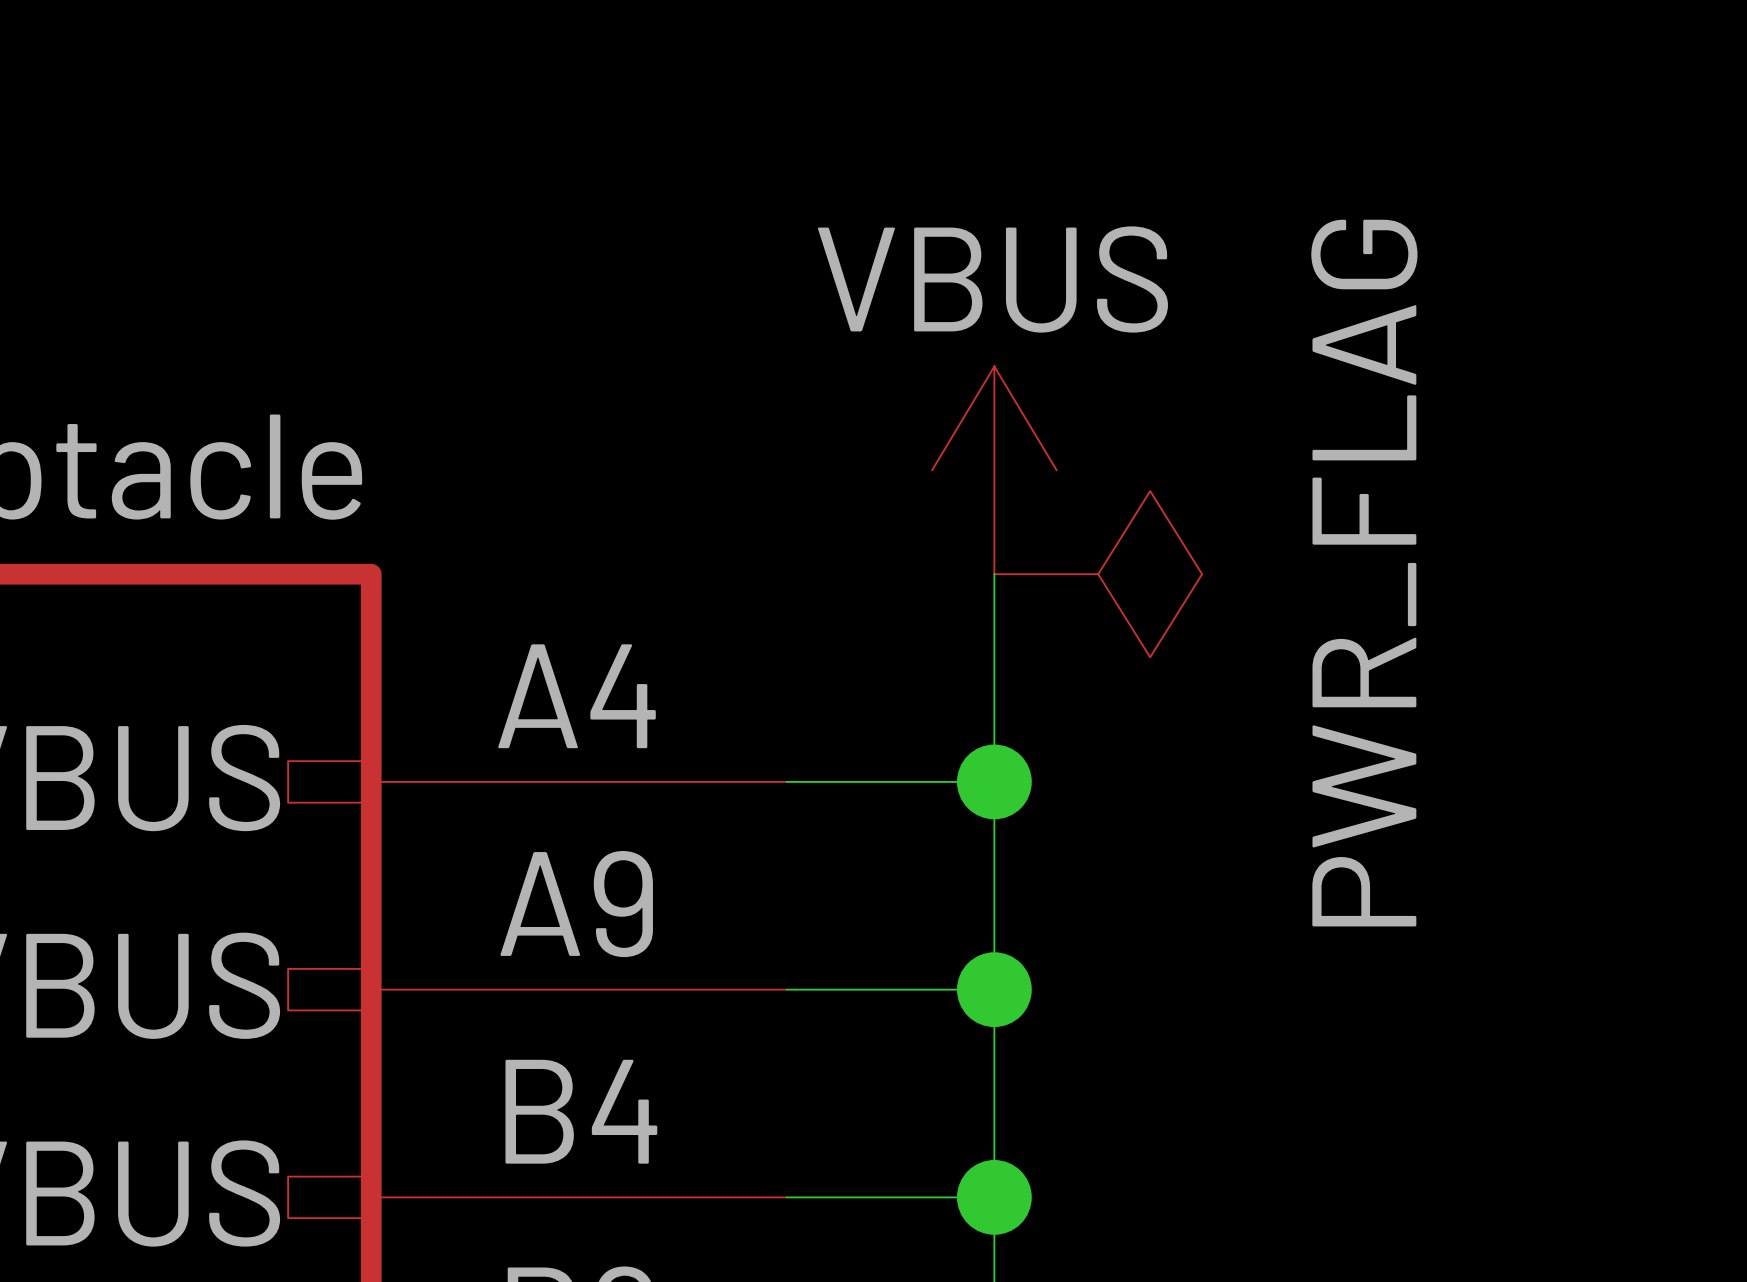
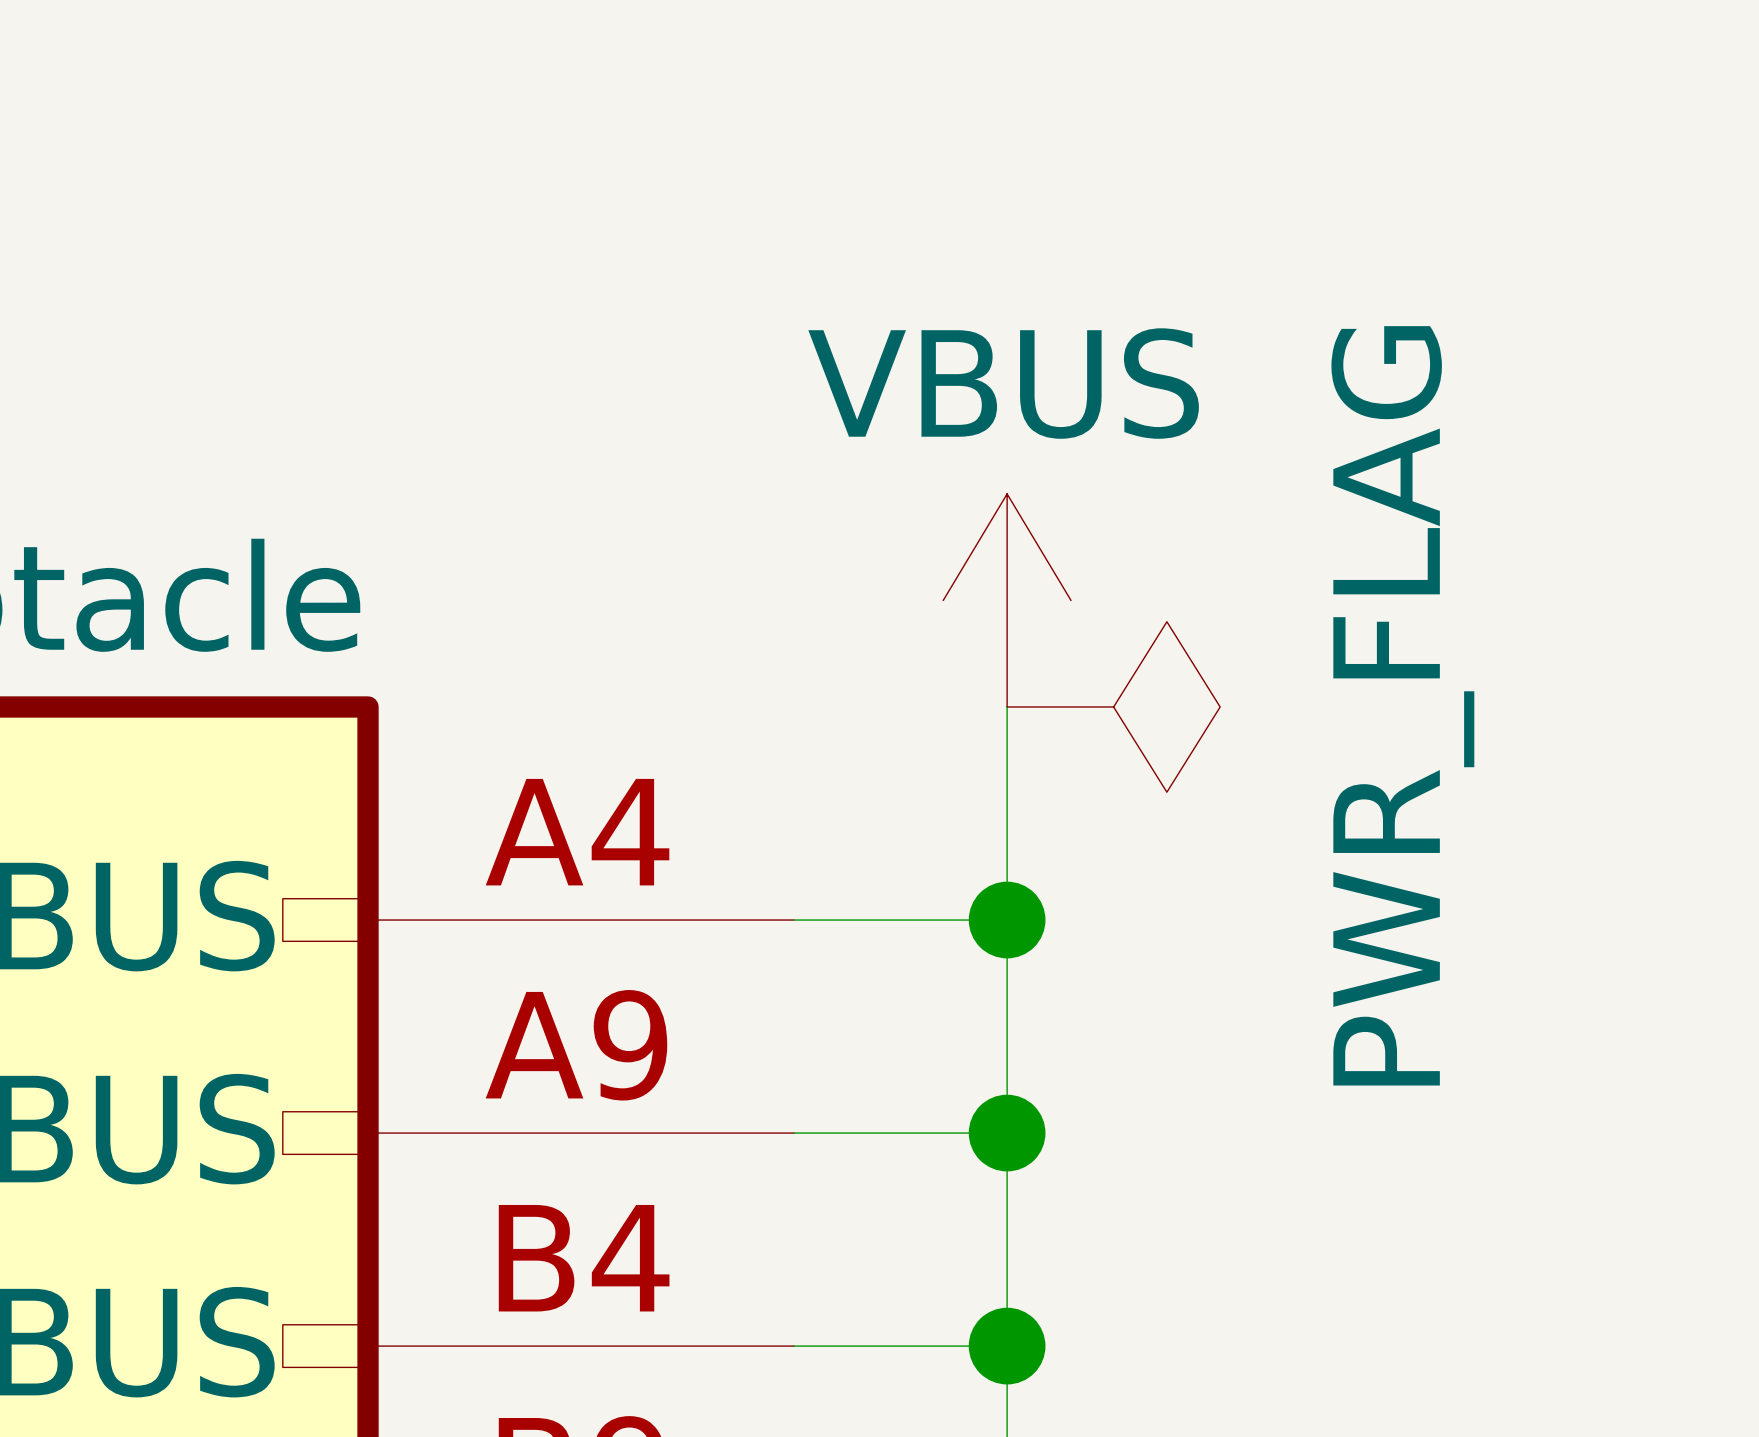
power symbol text position: VBUS (992, 279) -> VBUS (1003, 383)

